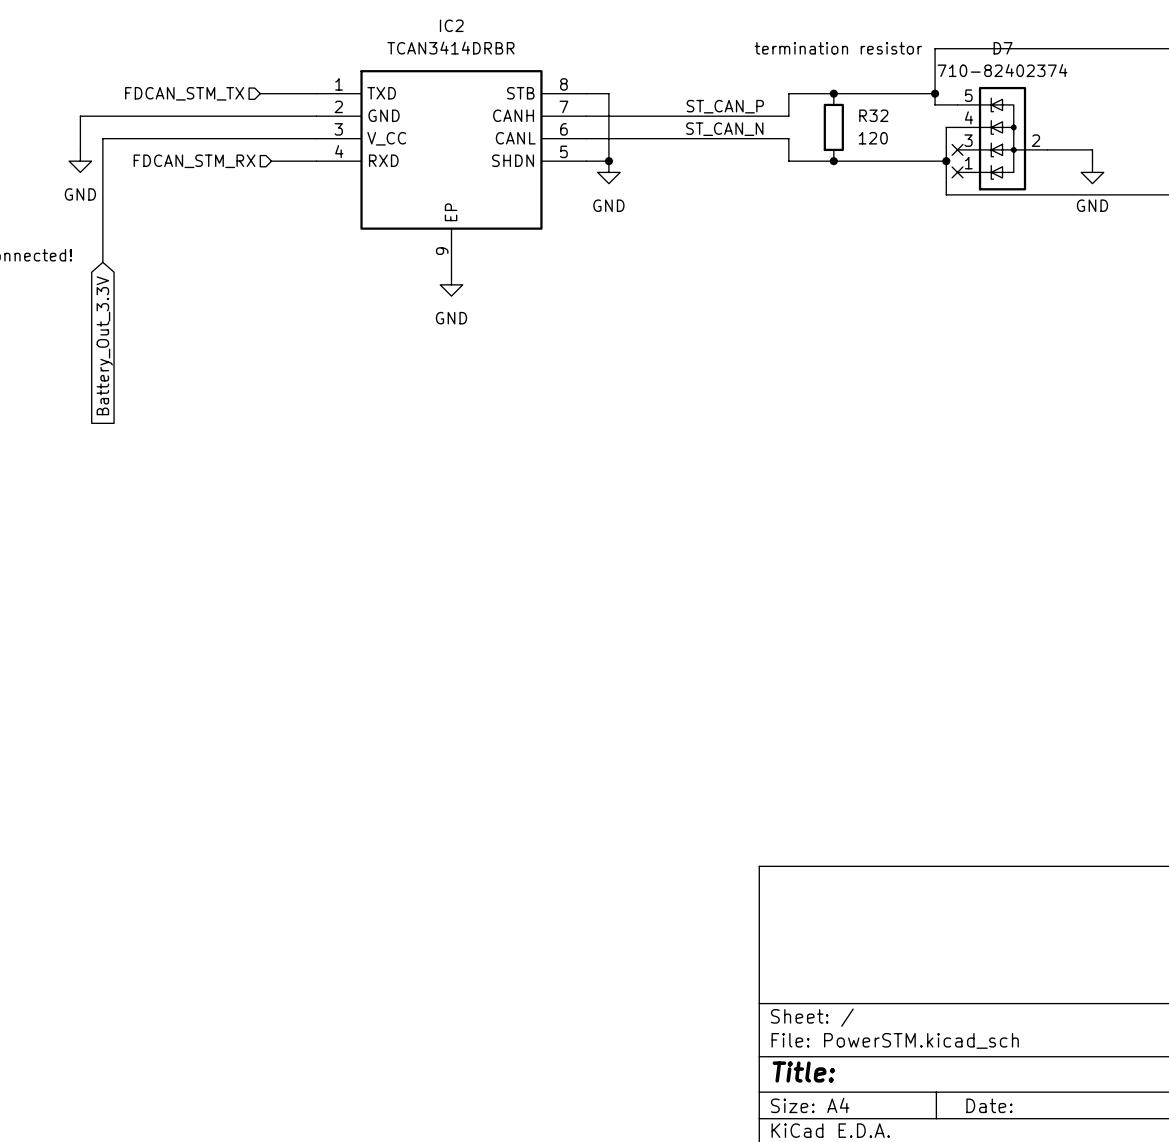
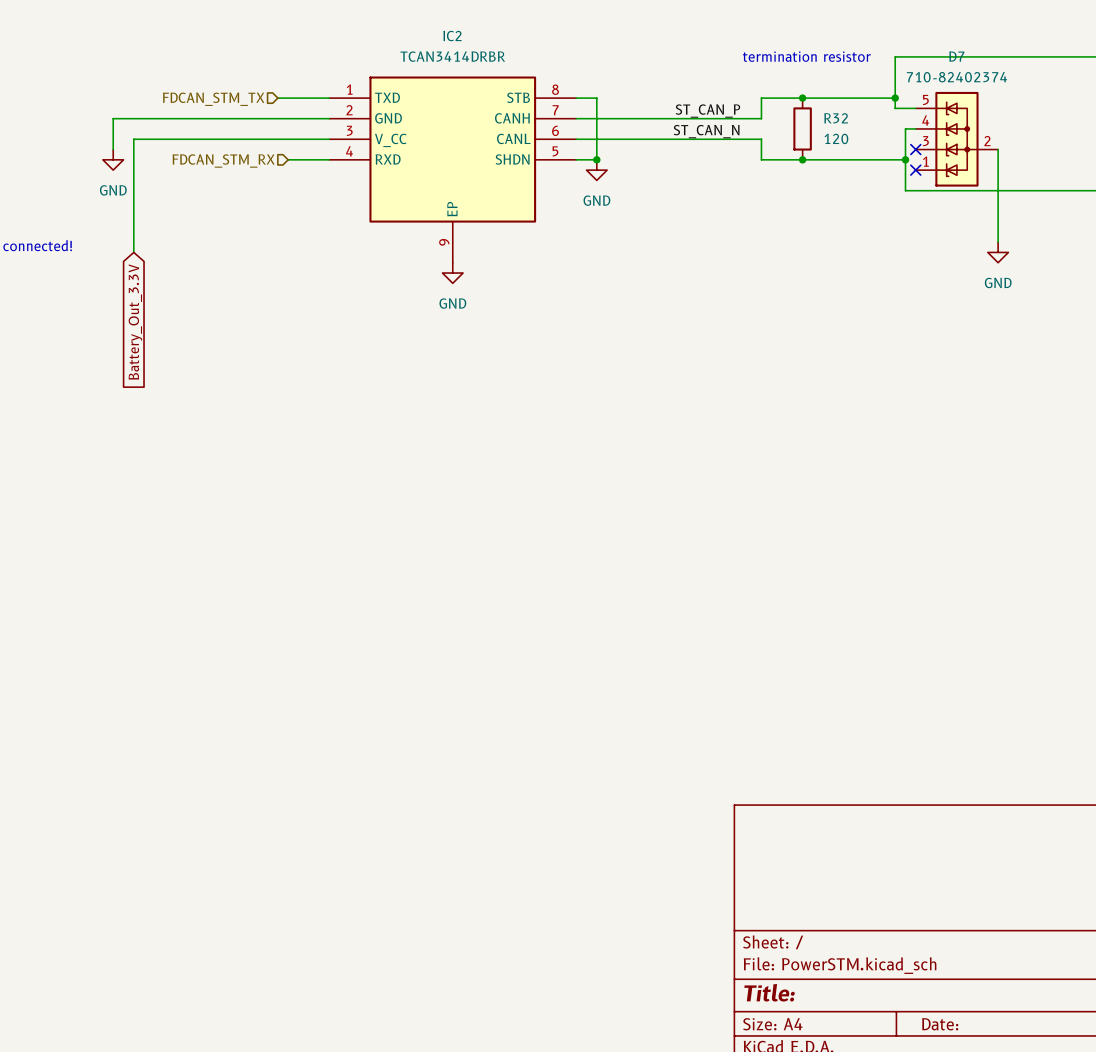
wire: (1047, 149) (1092, 149) (1092, 161) -> (998, 149) (998, 242)
power symbol position: GND (1092, 172) -> GND (998, 252)

